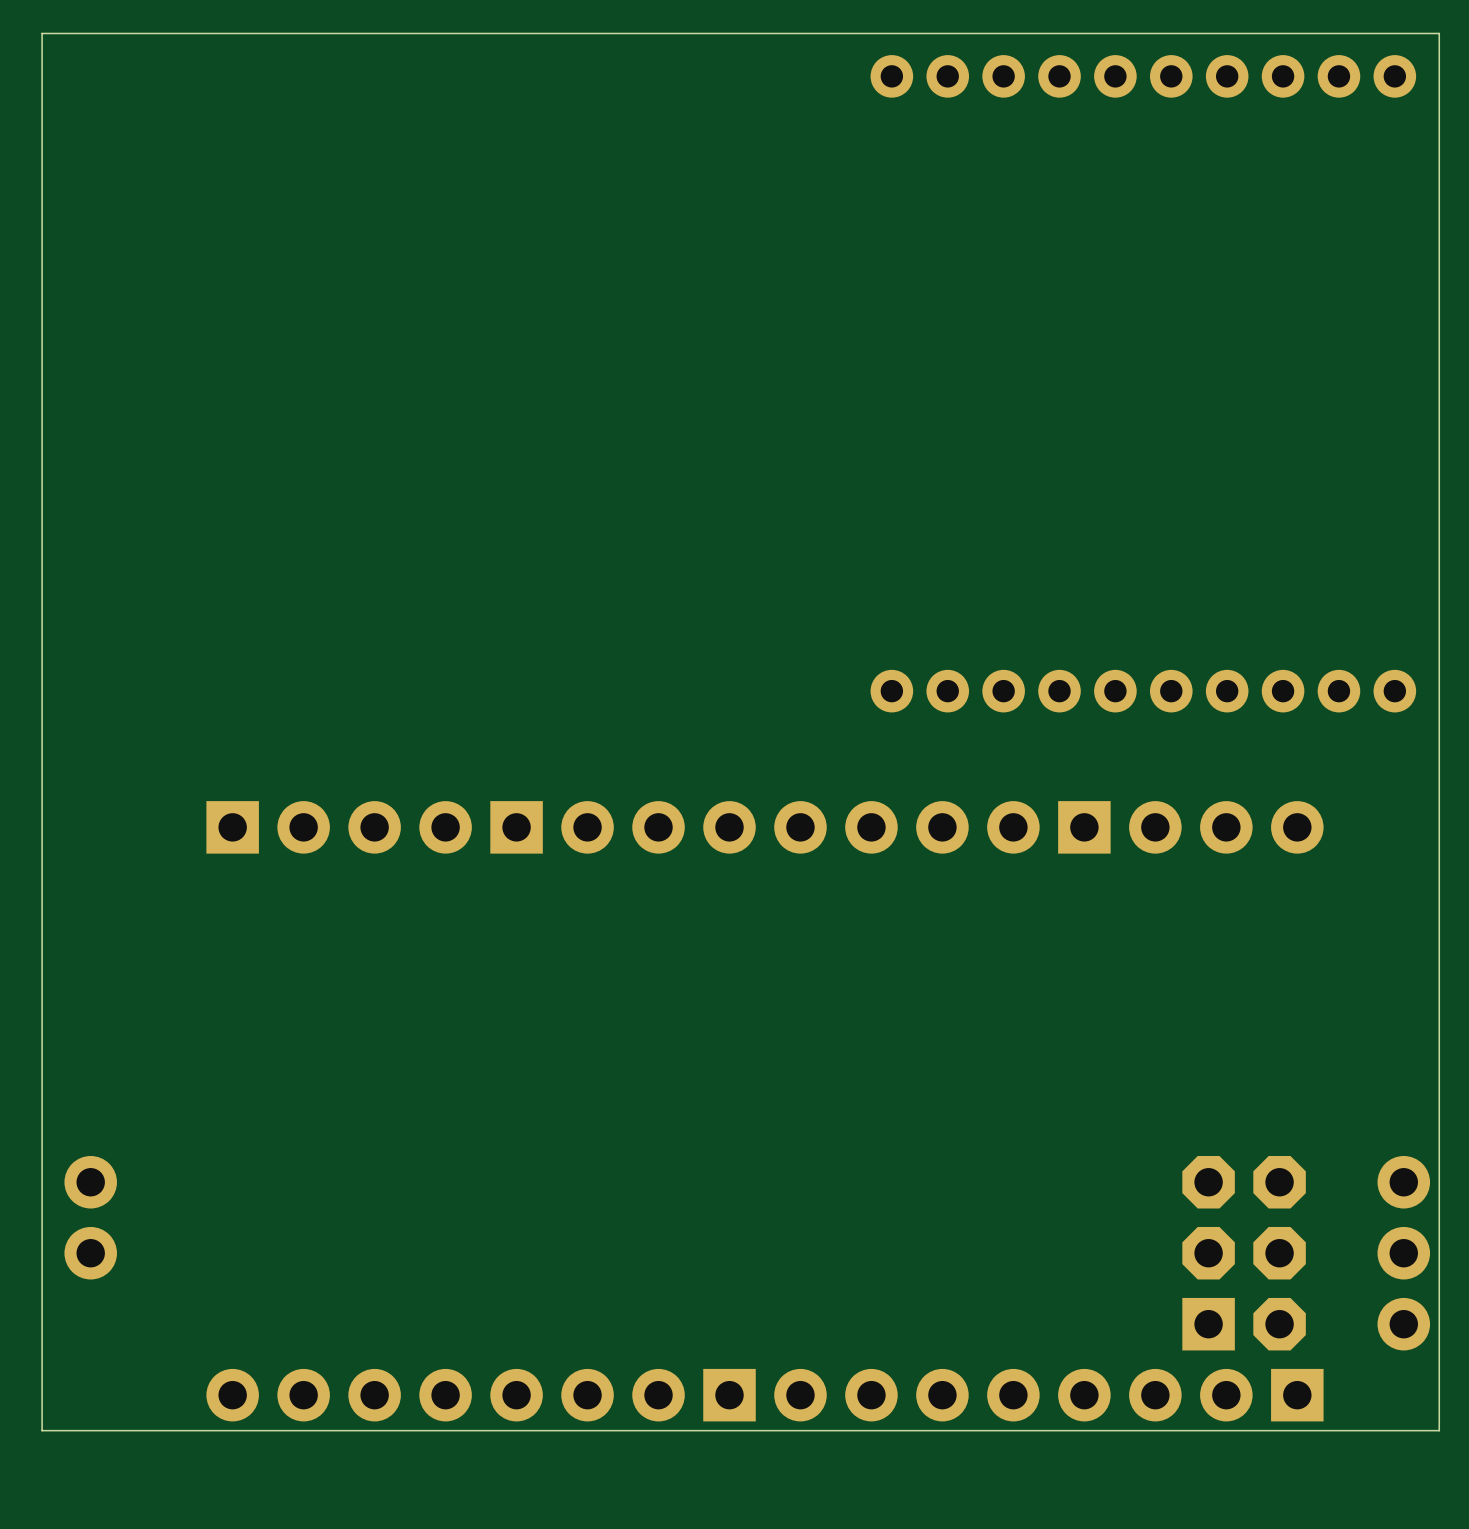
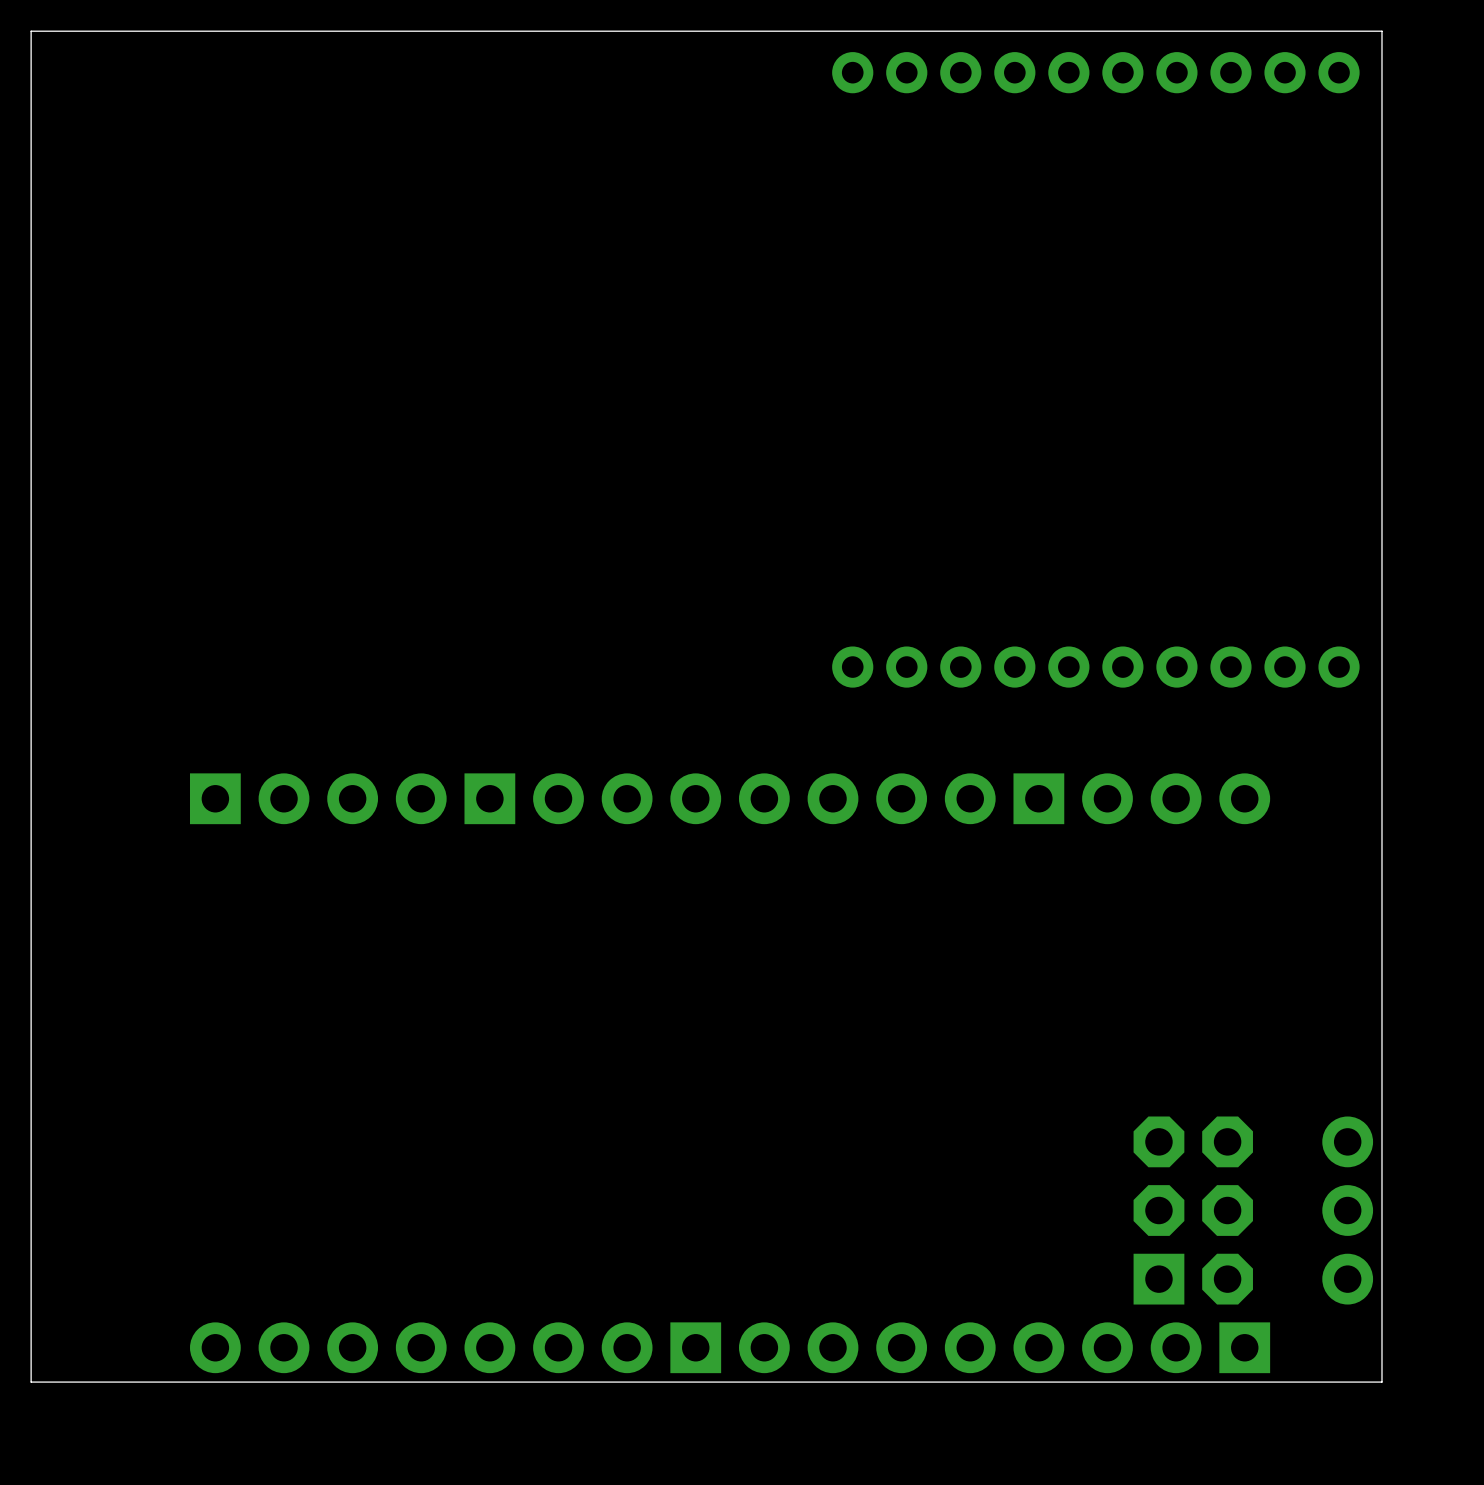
part: (90, 1217) -> none

